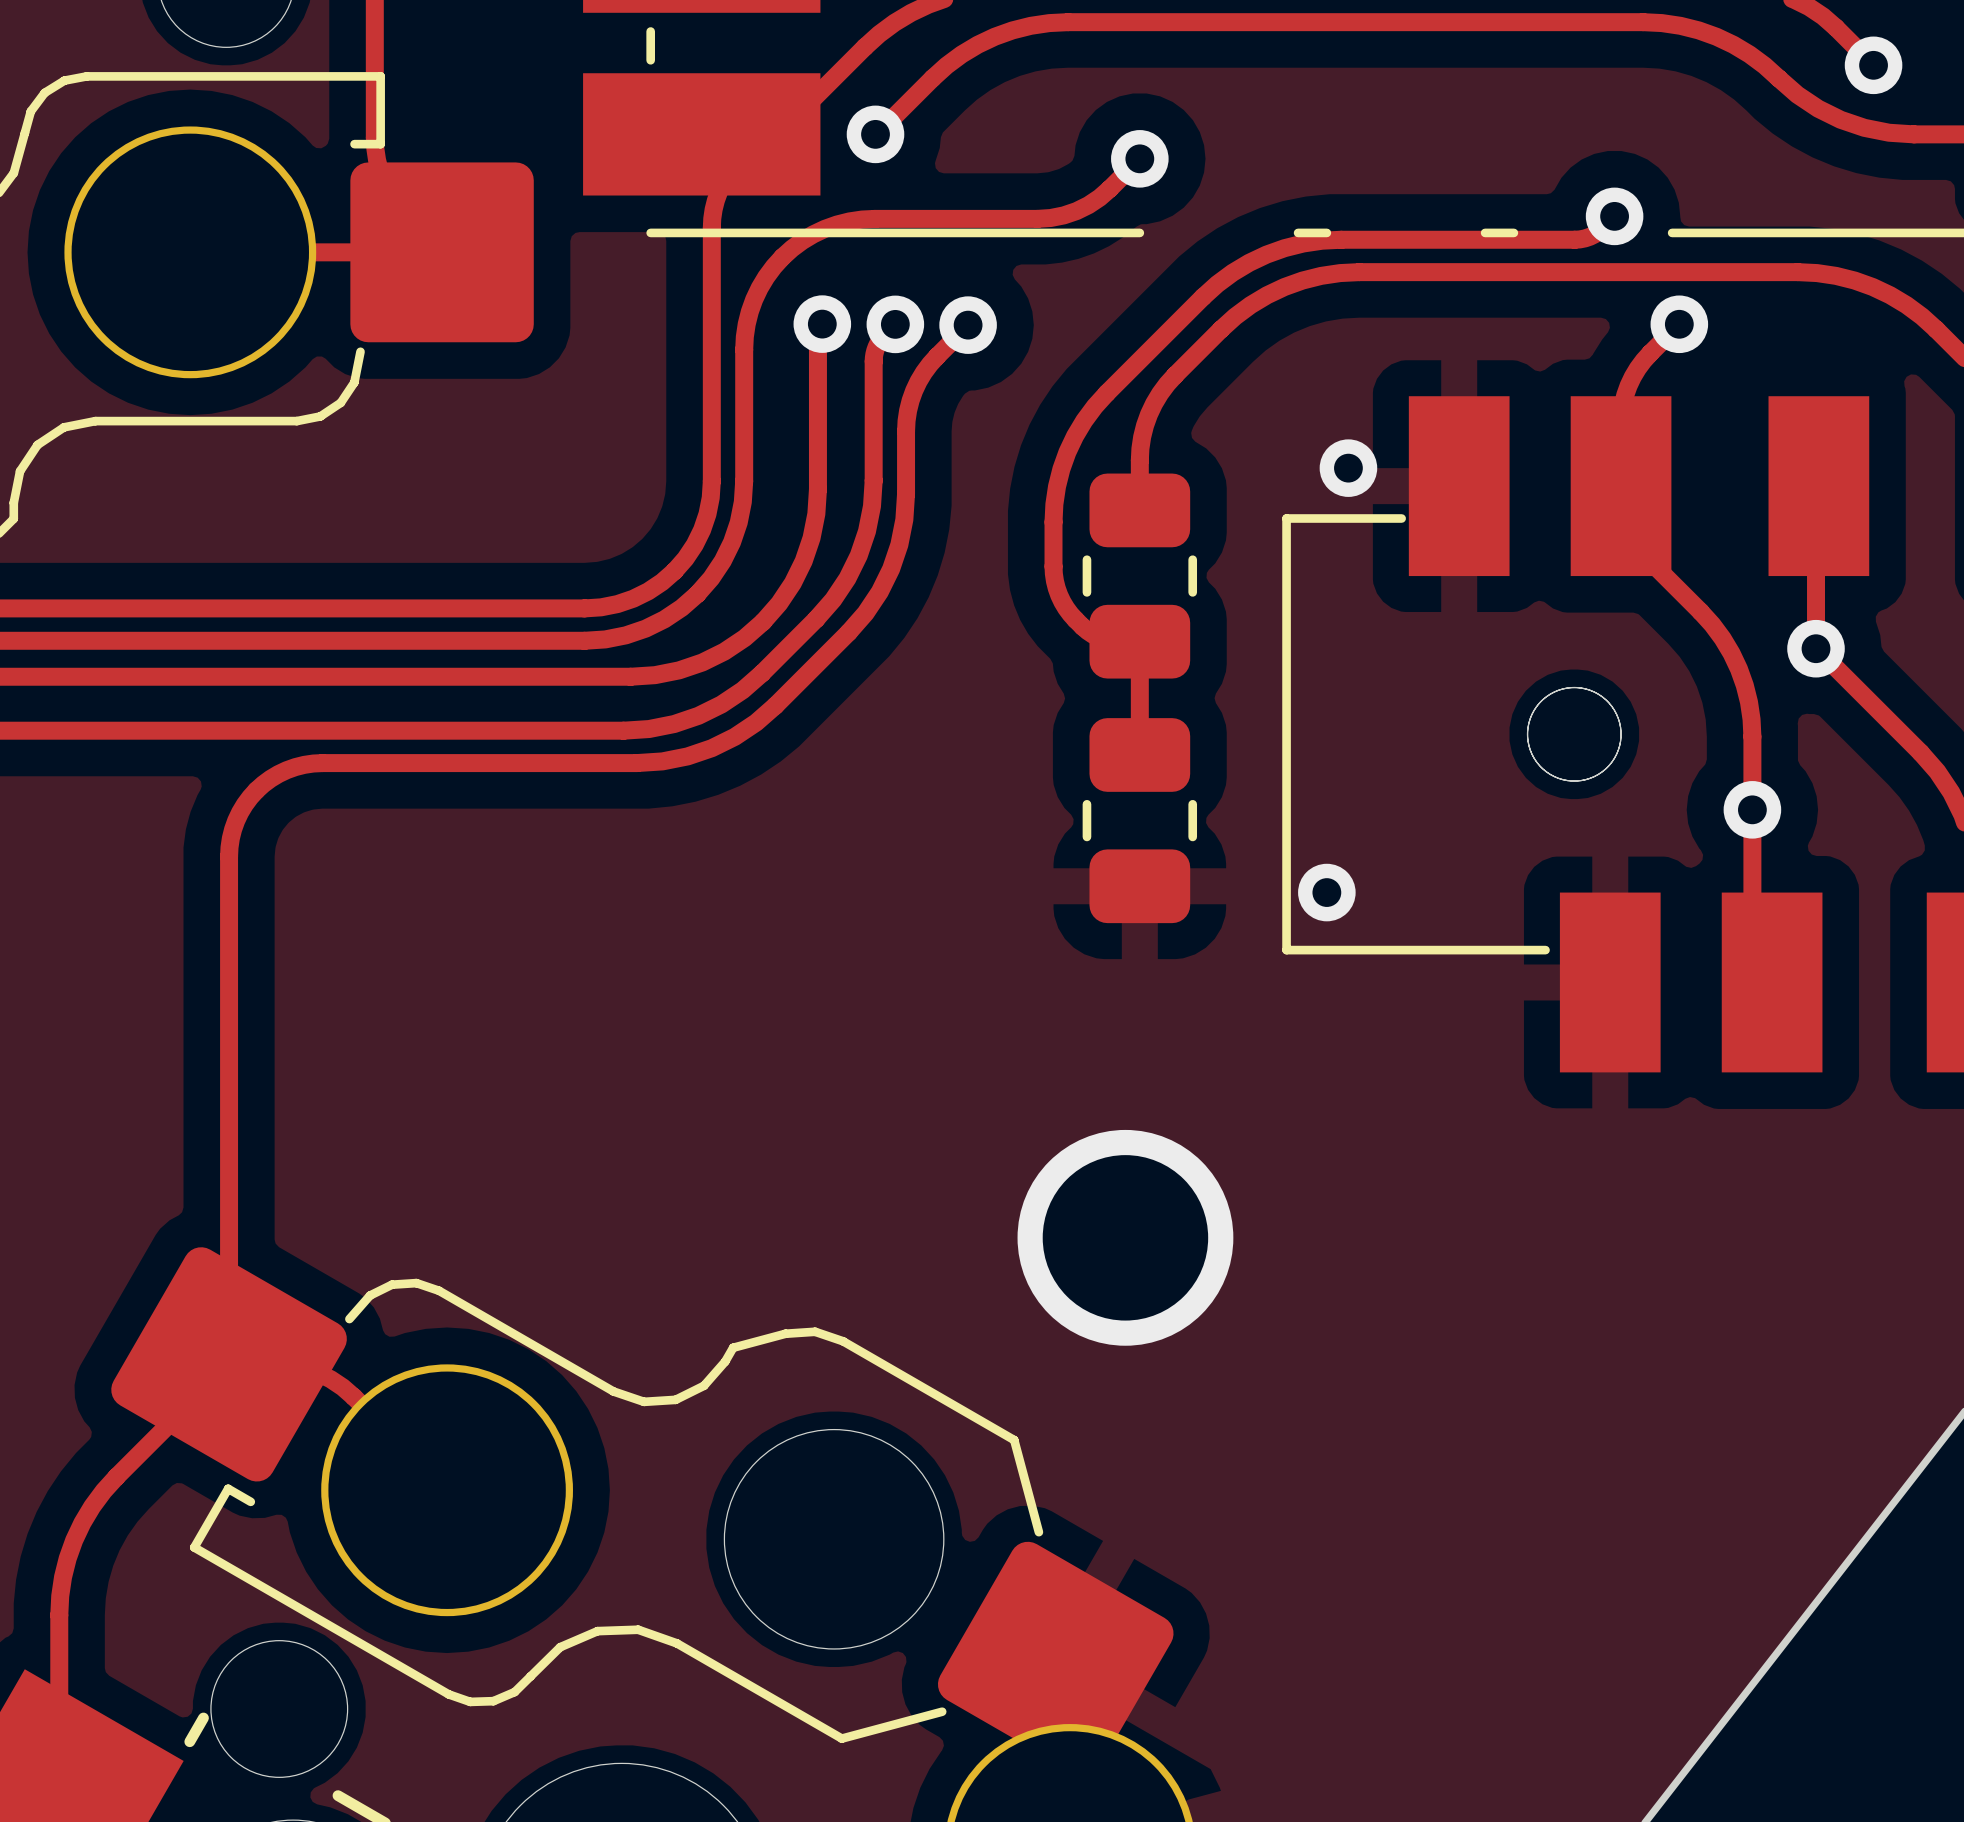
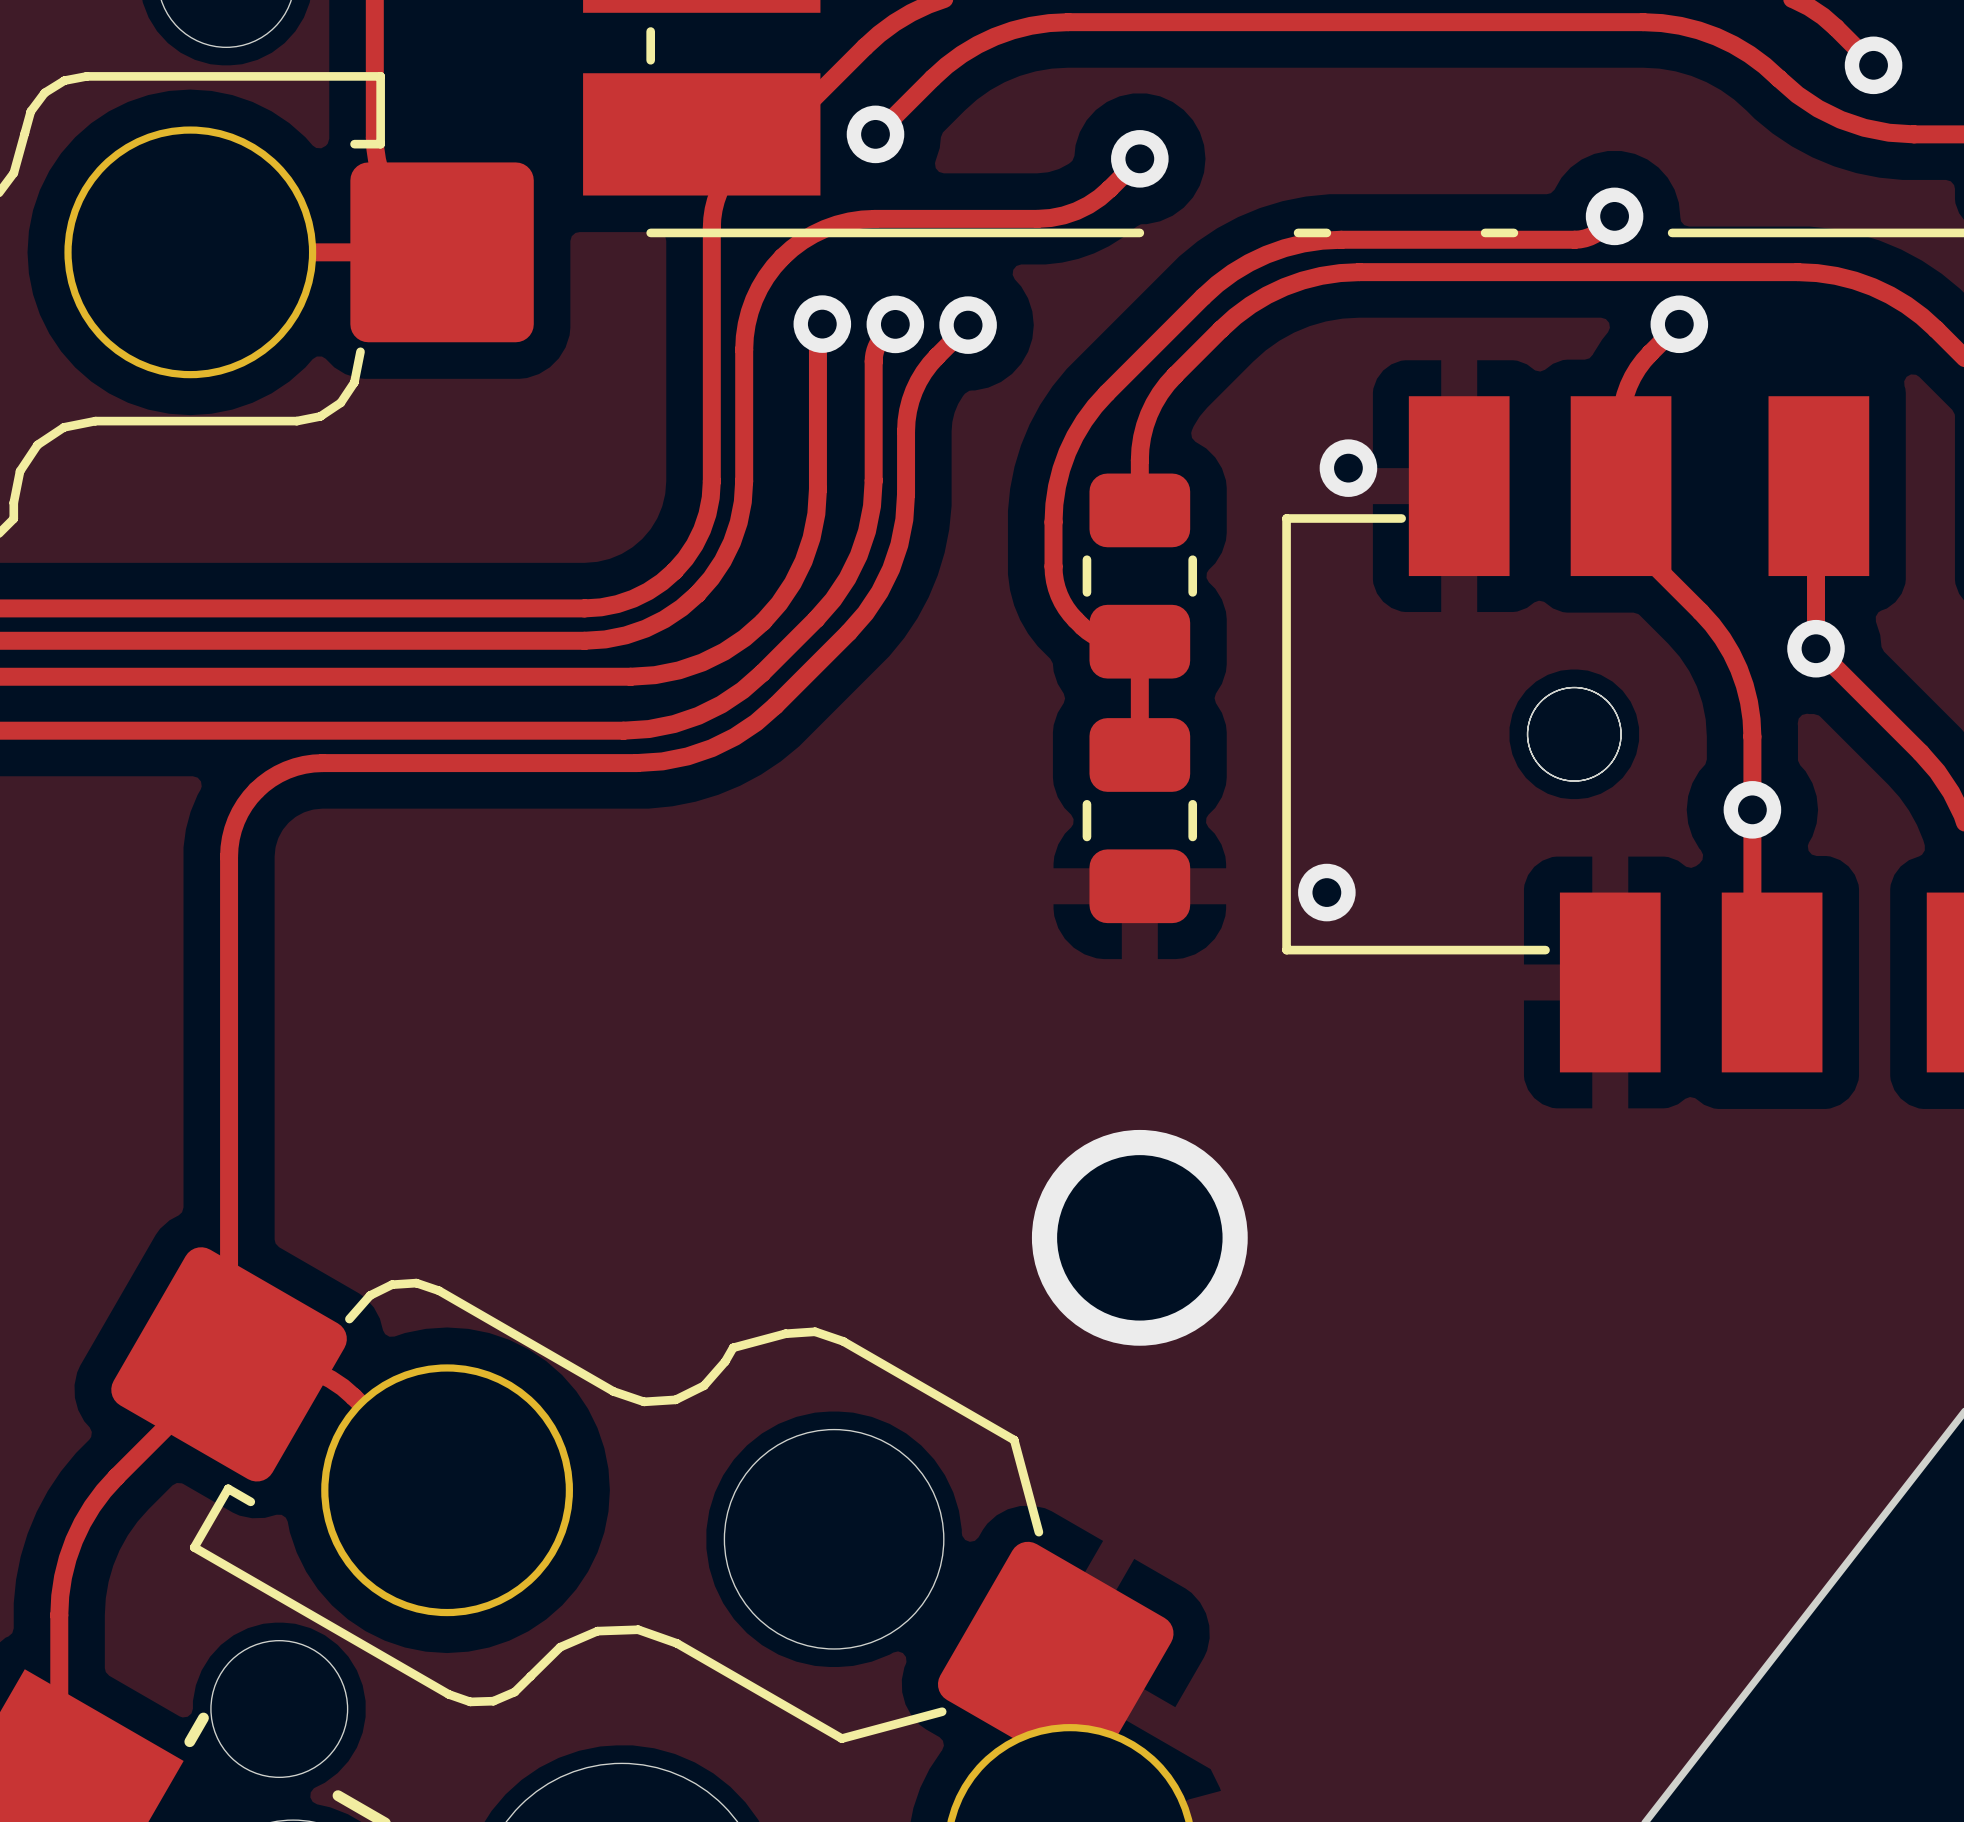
via position: (1125, 1237) -> (1139, 1237)

